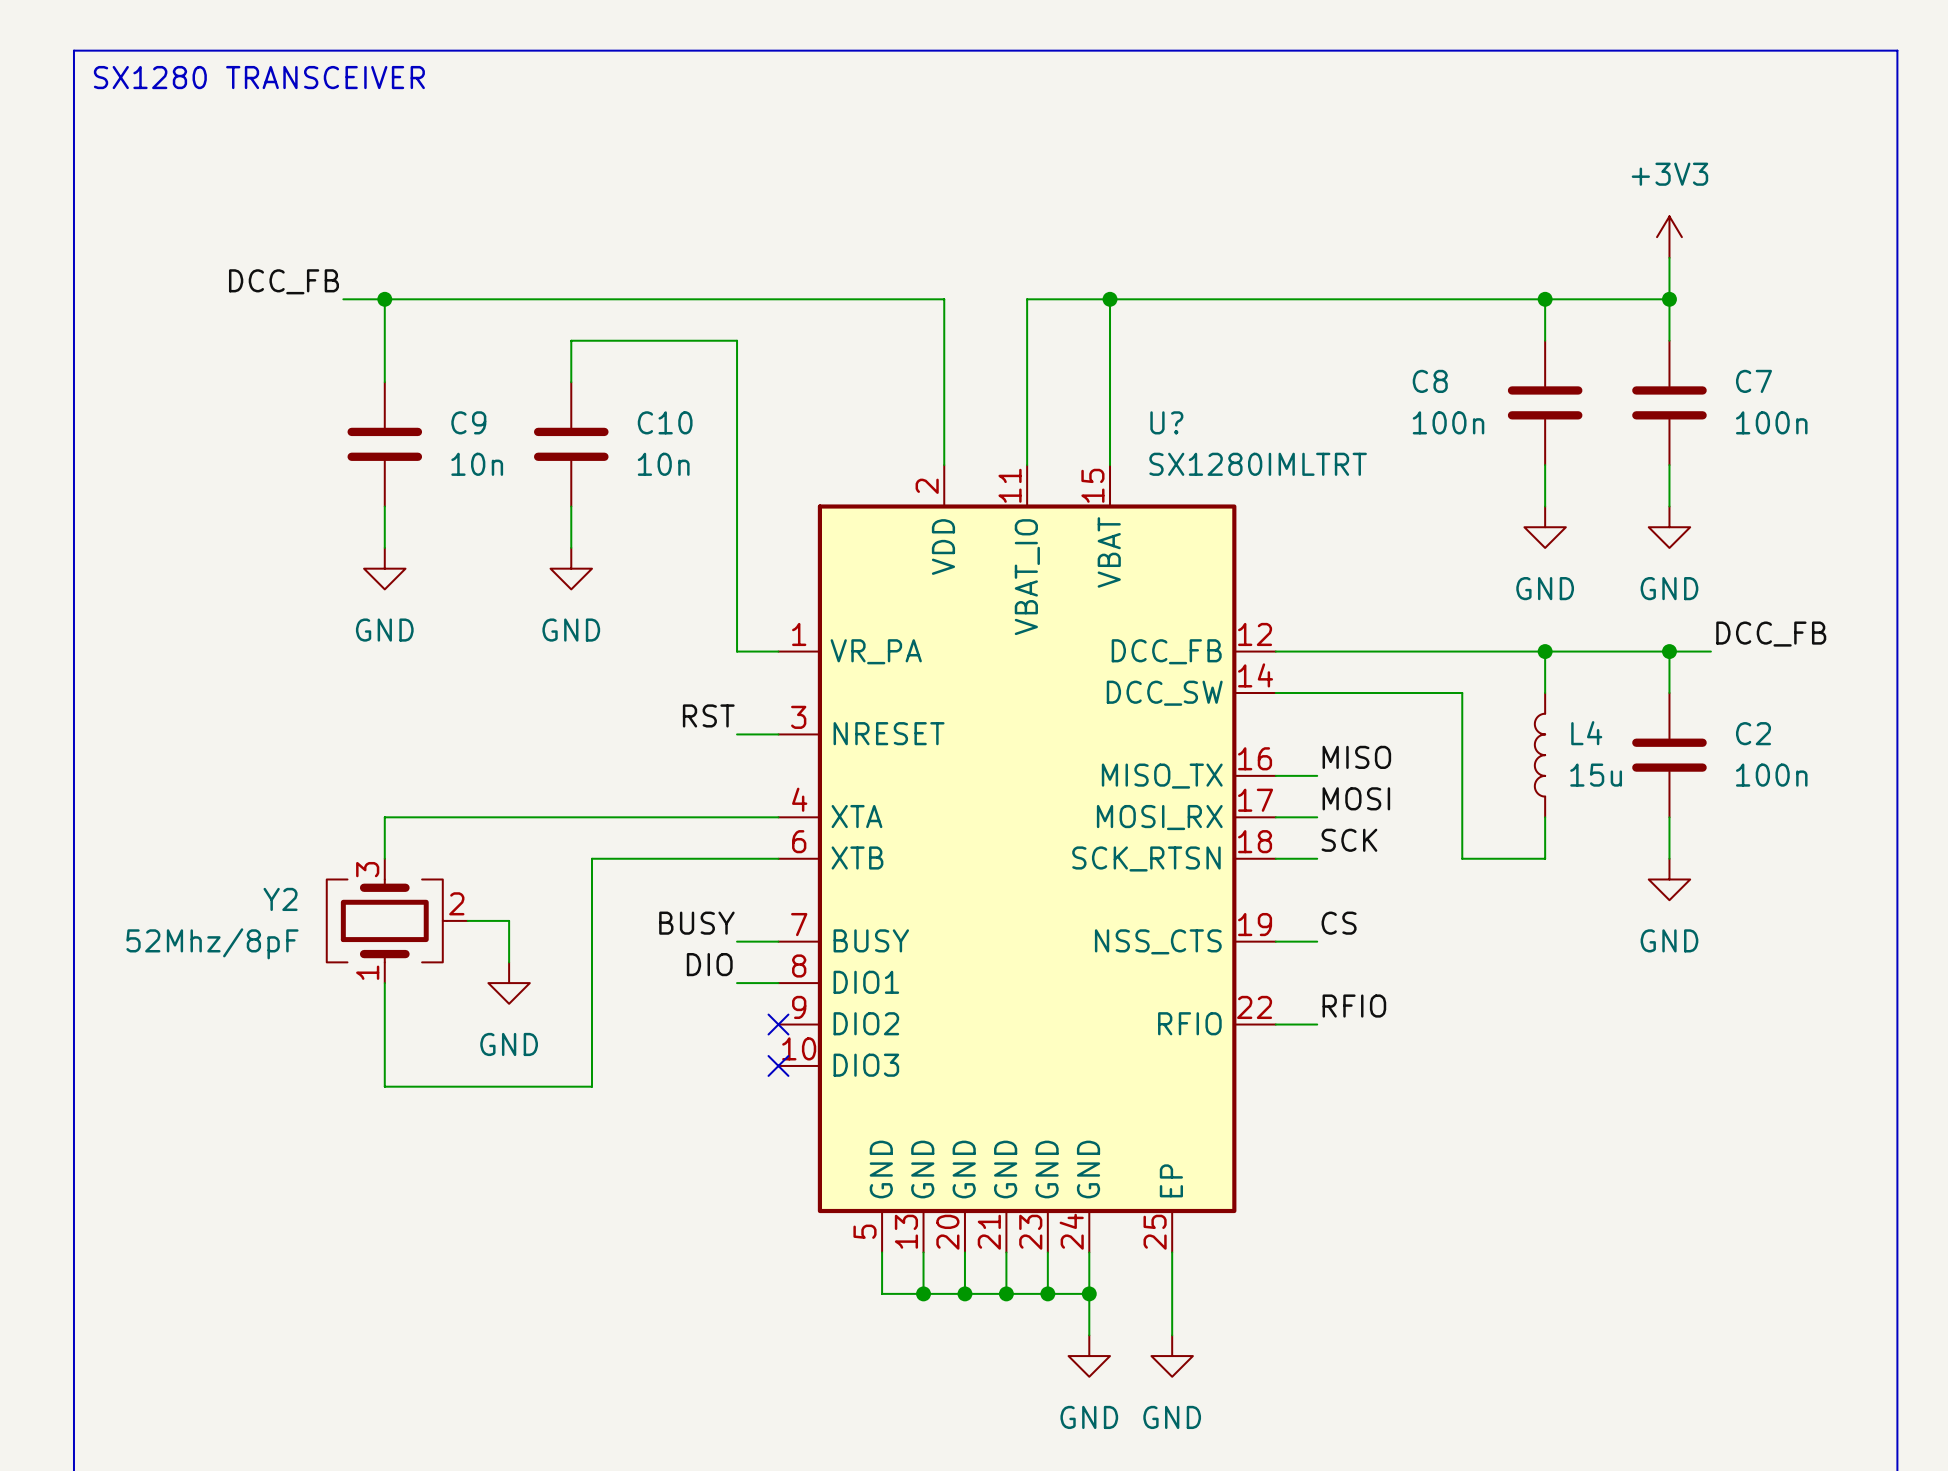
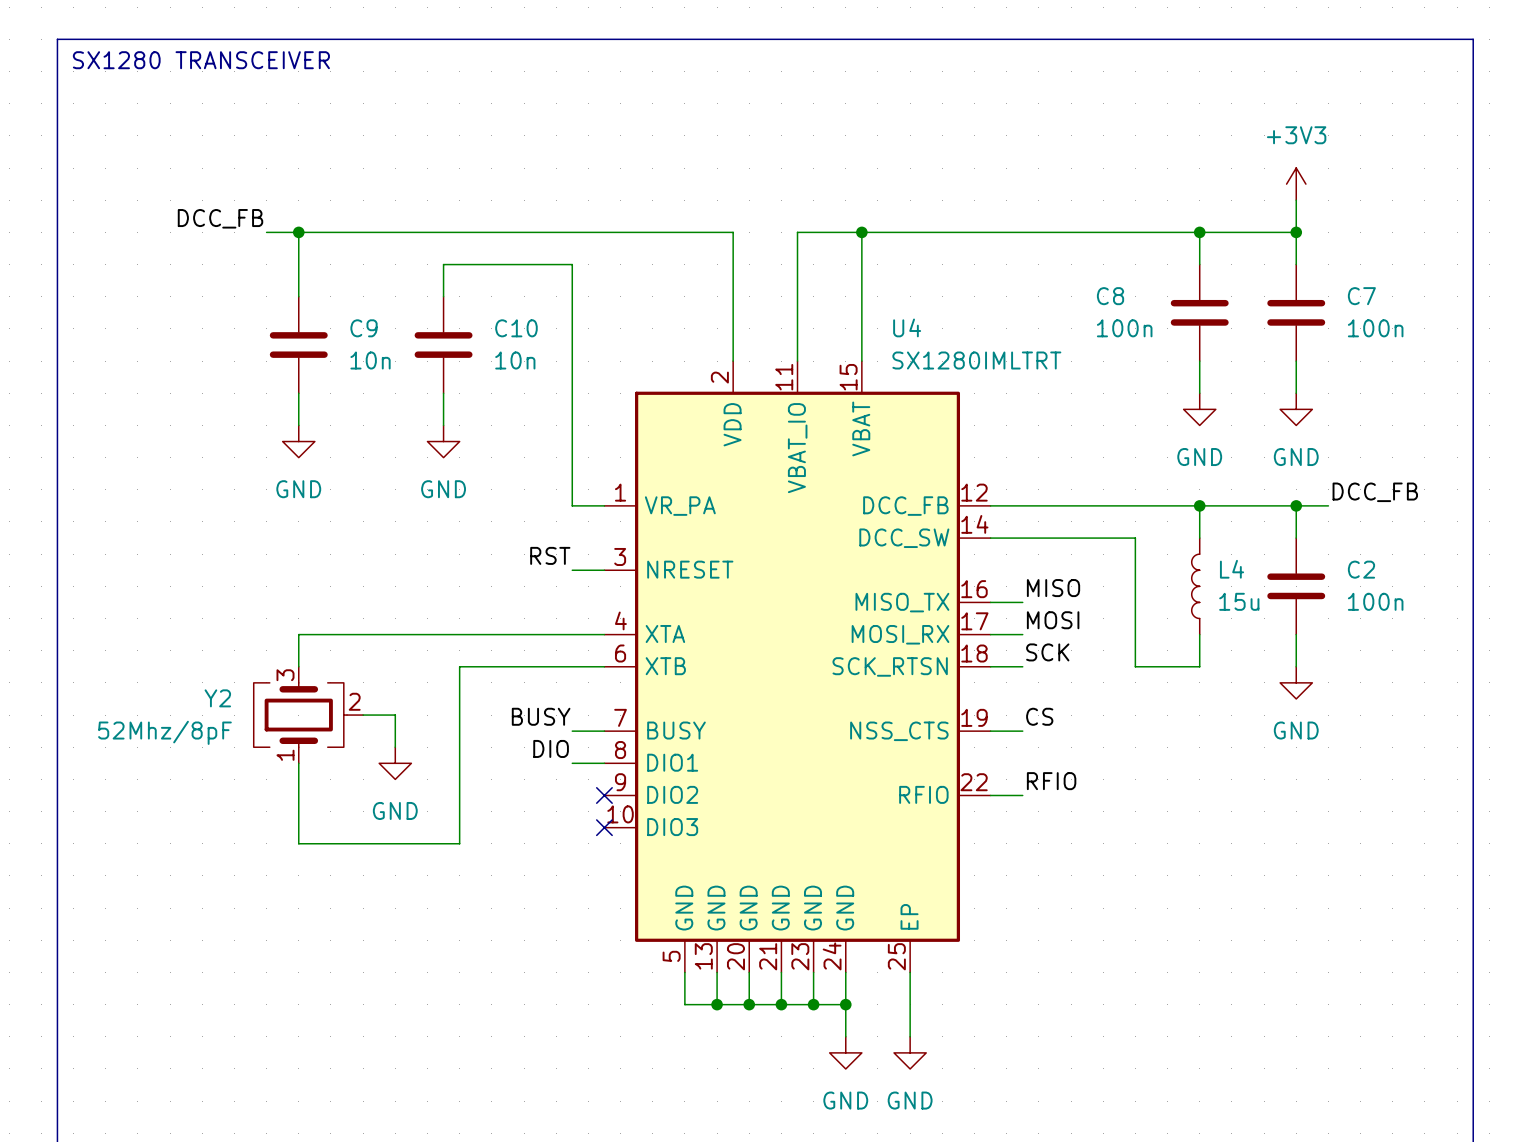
U? name: U? (1166, 422) -> U4 (907, 327)

